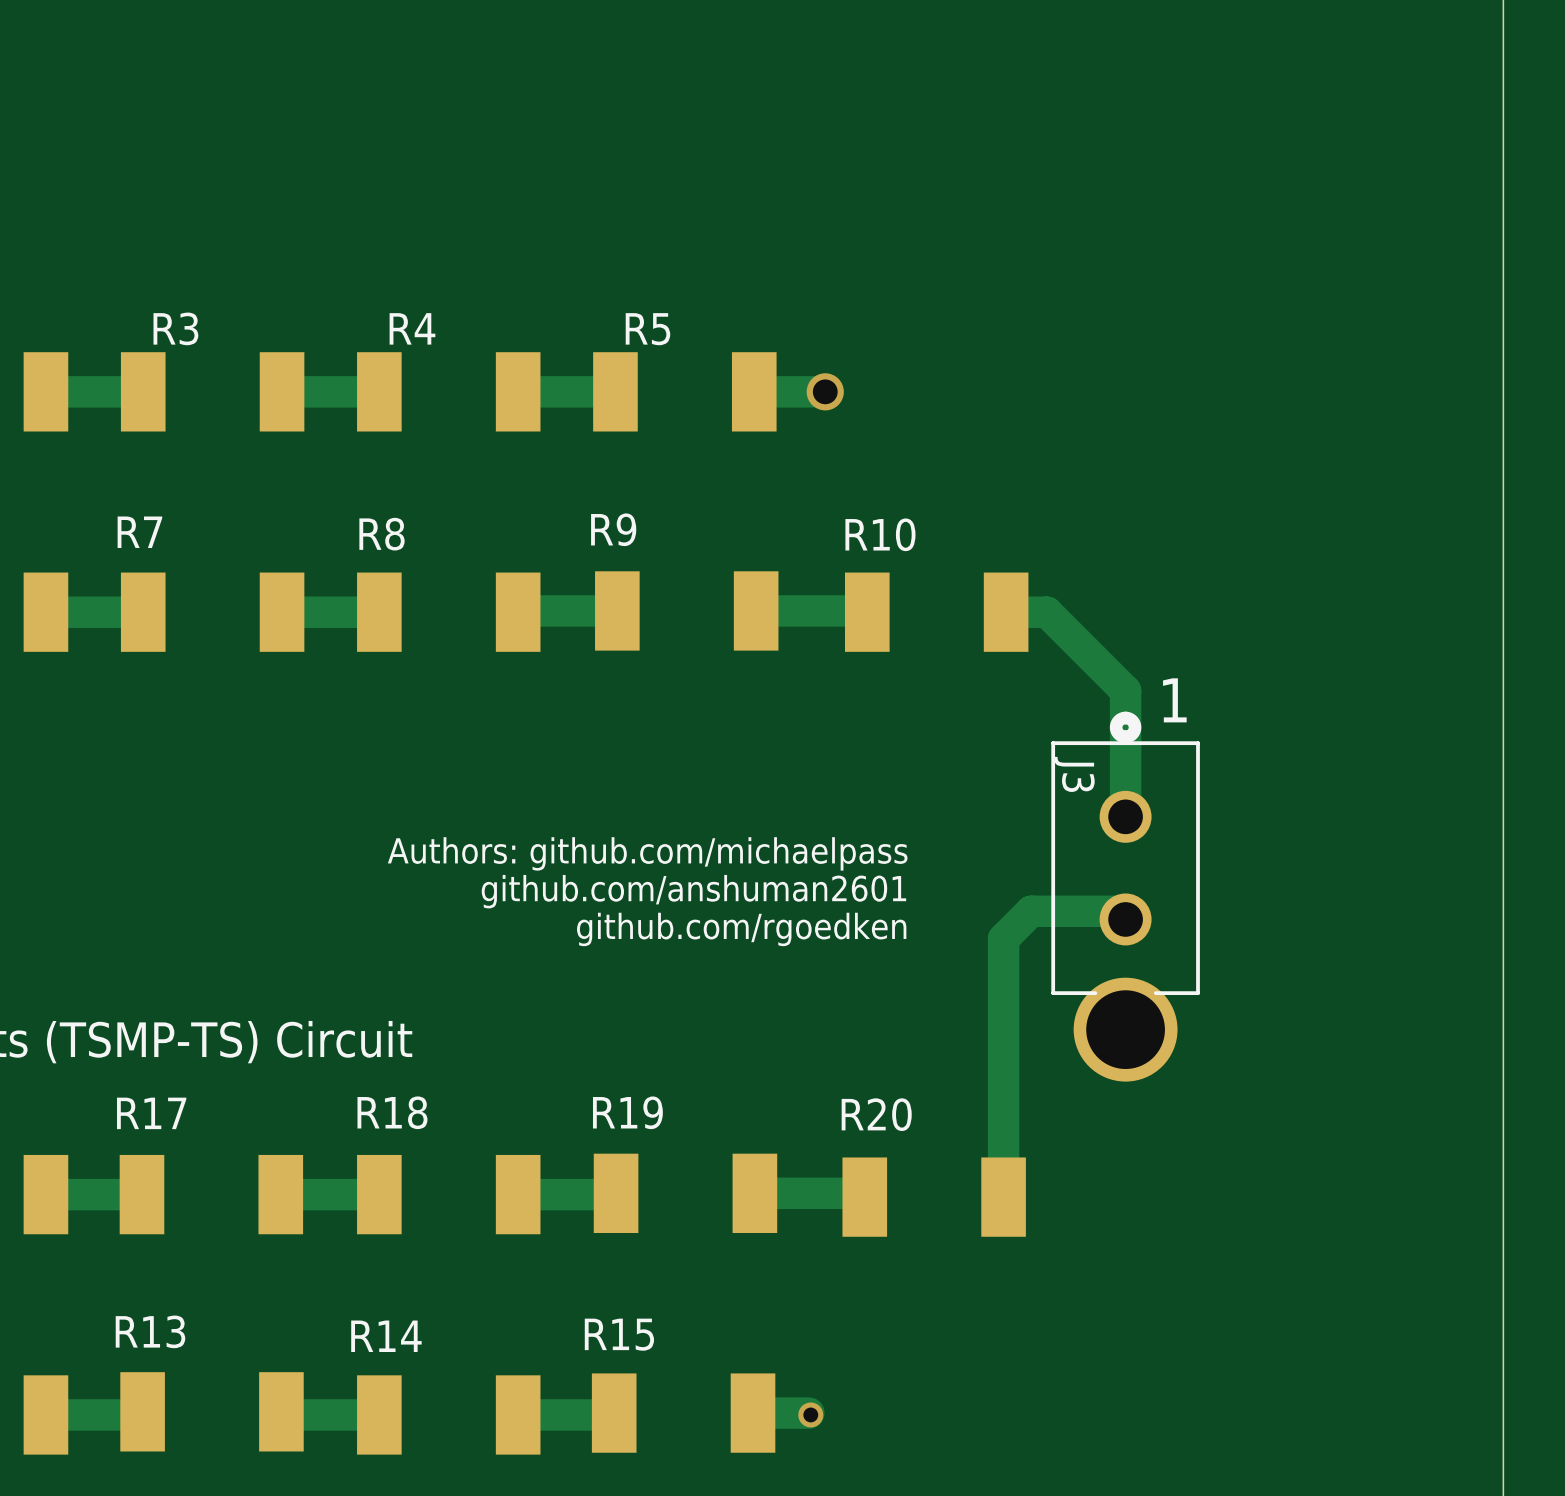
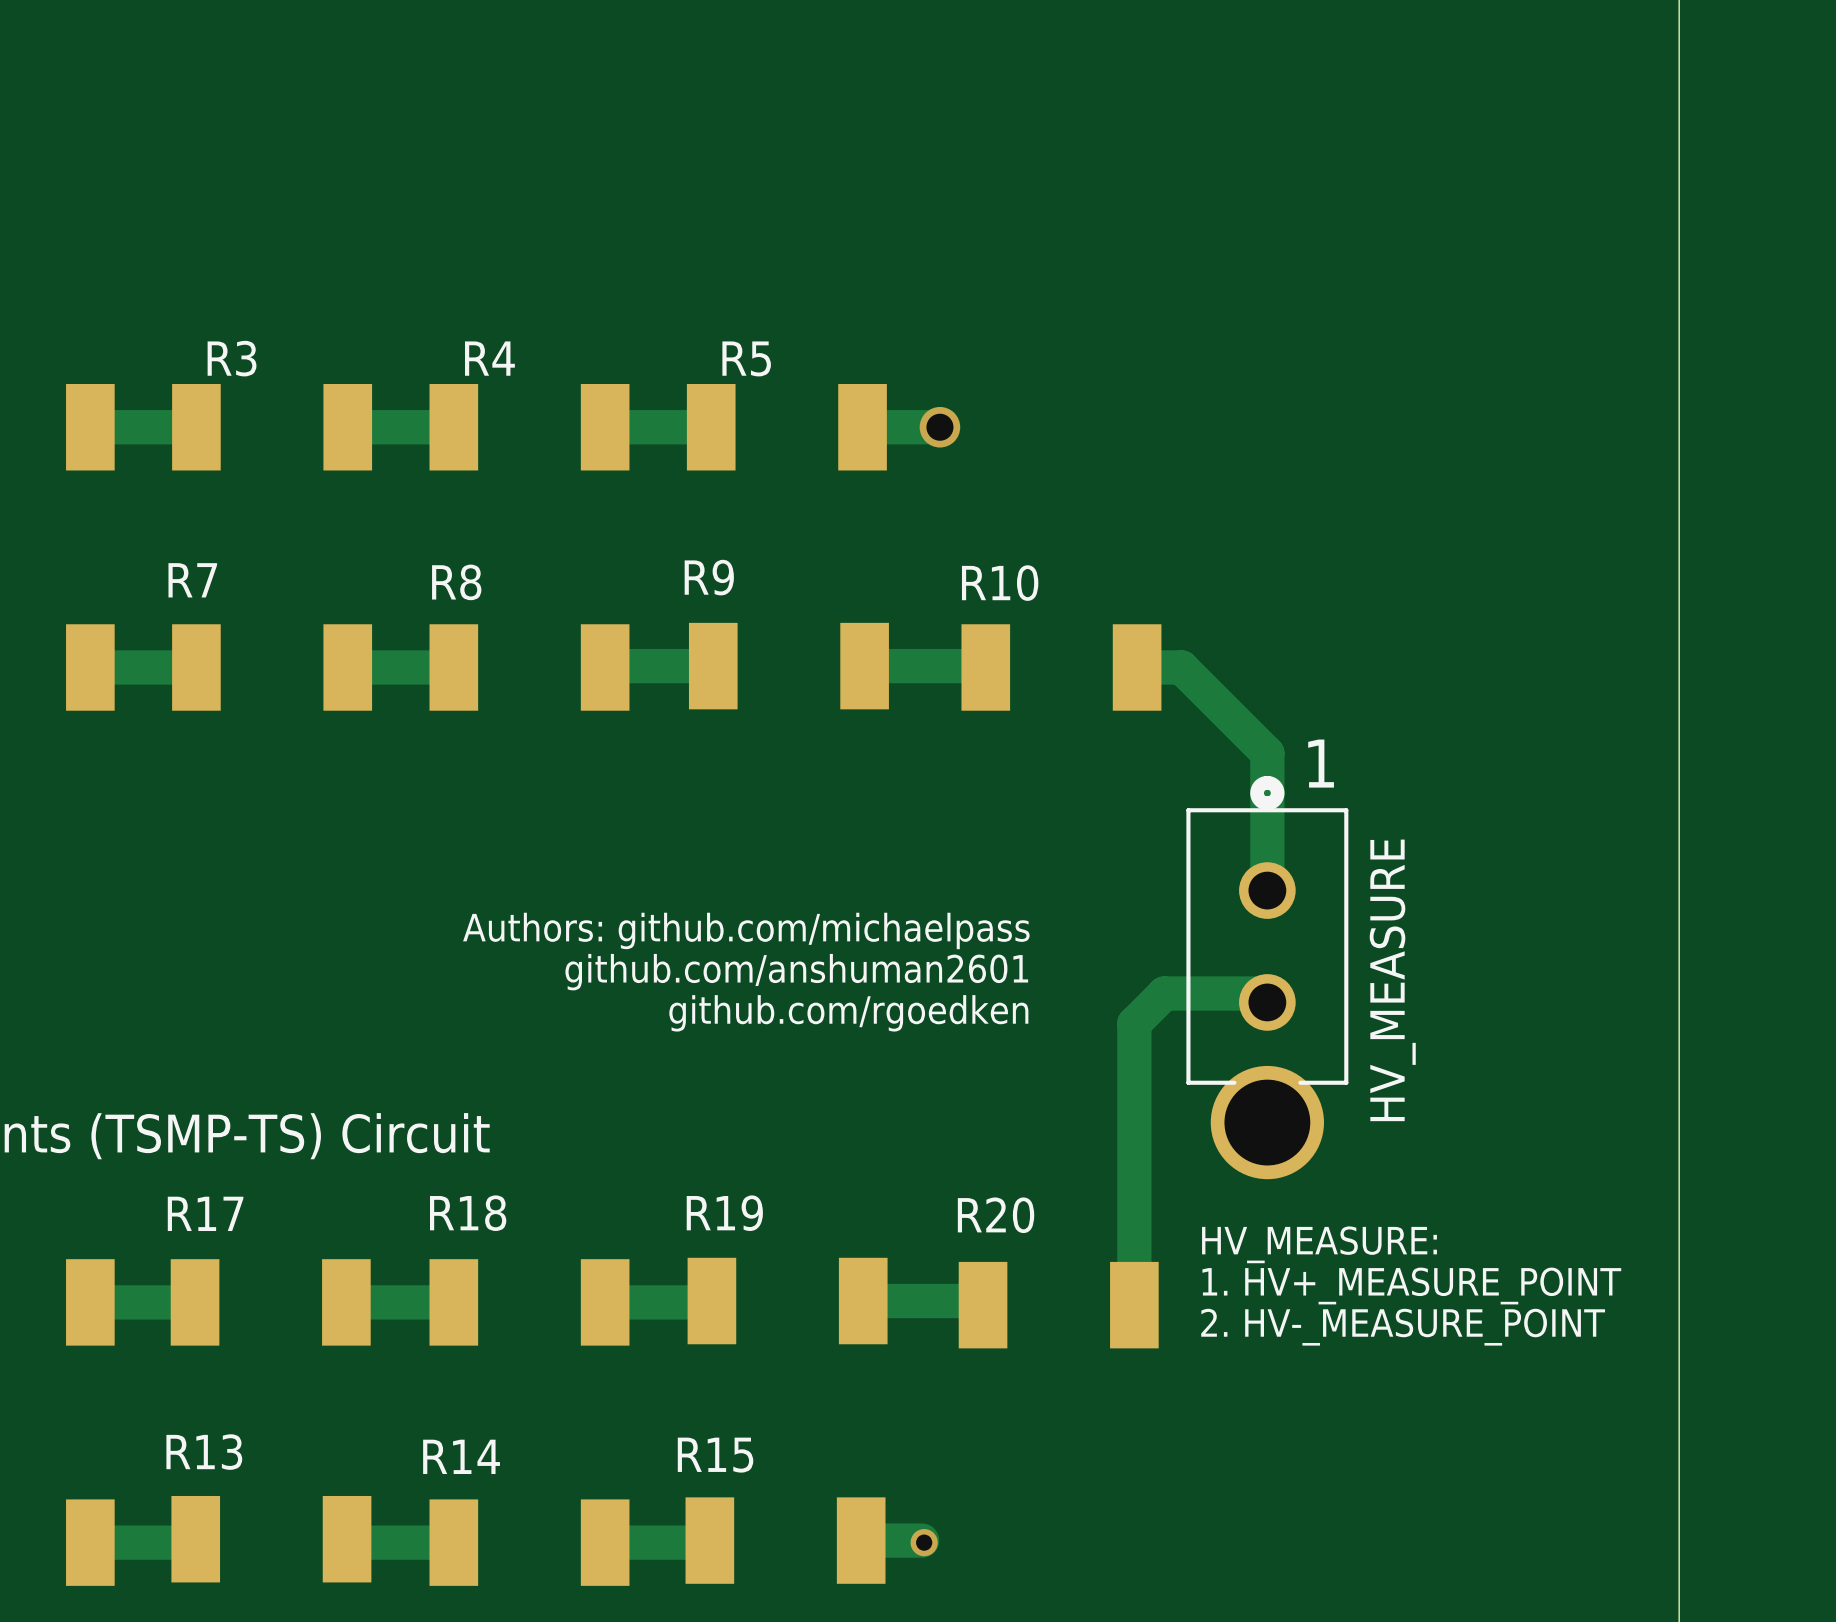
J3 name: J3 (1074, 774) -> HV_MEASURE (1392, 980)
text: none -> HV_MEASURE: (1319, 1244)
text: none -> 1. HV+_MEASURE_POINT (1411, 1286)
text: none -> 2. HV-_MEASURE_POINT (1403, 1327)

